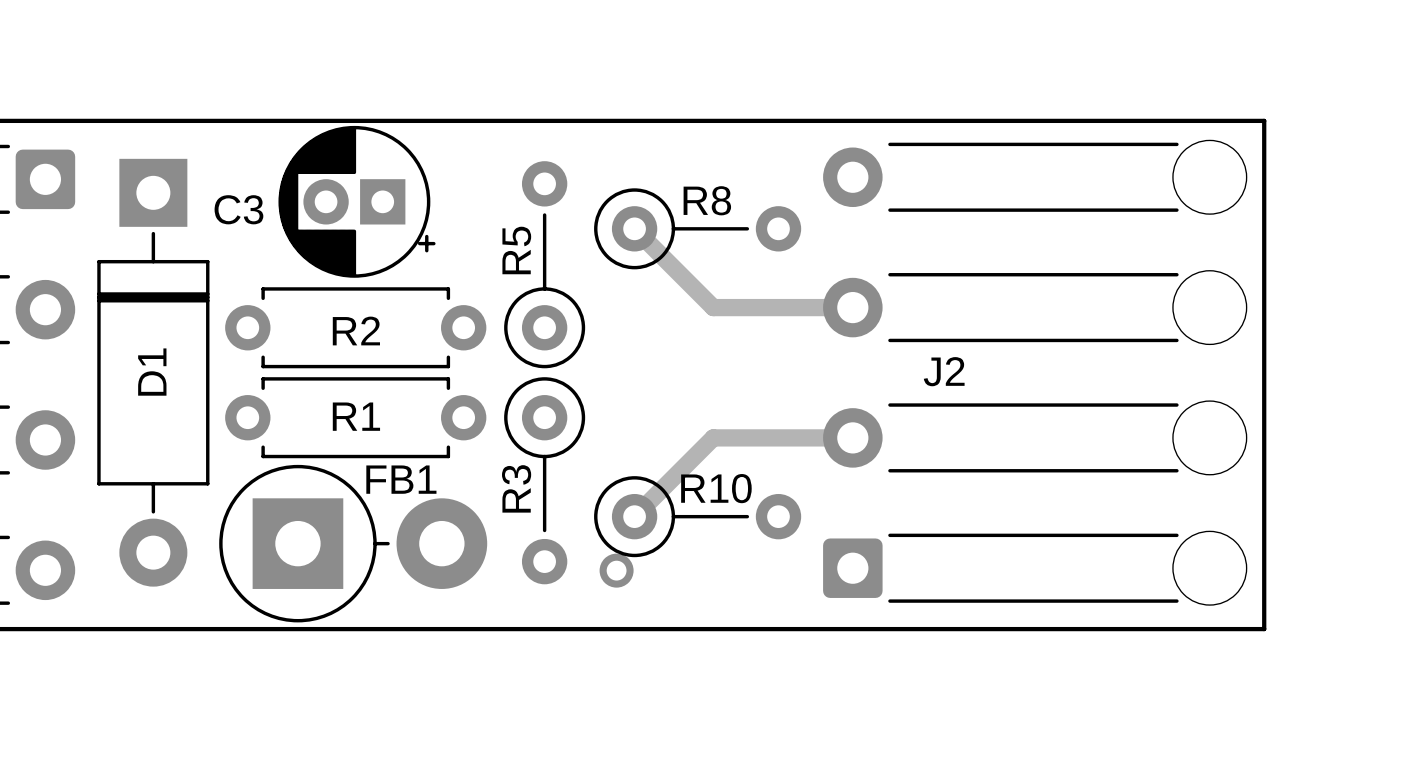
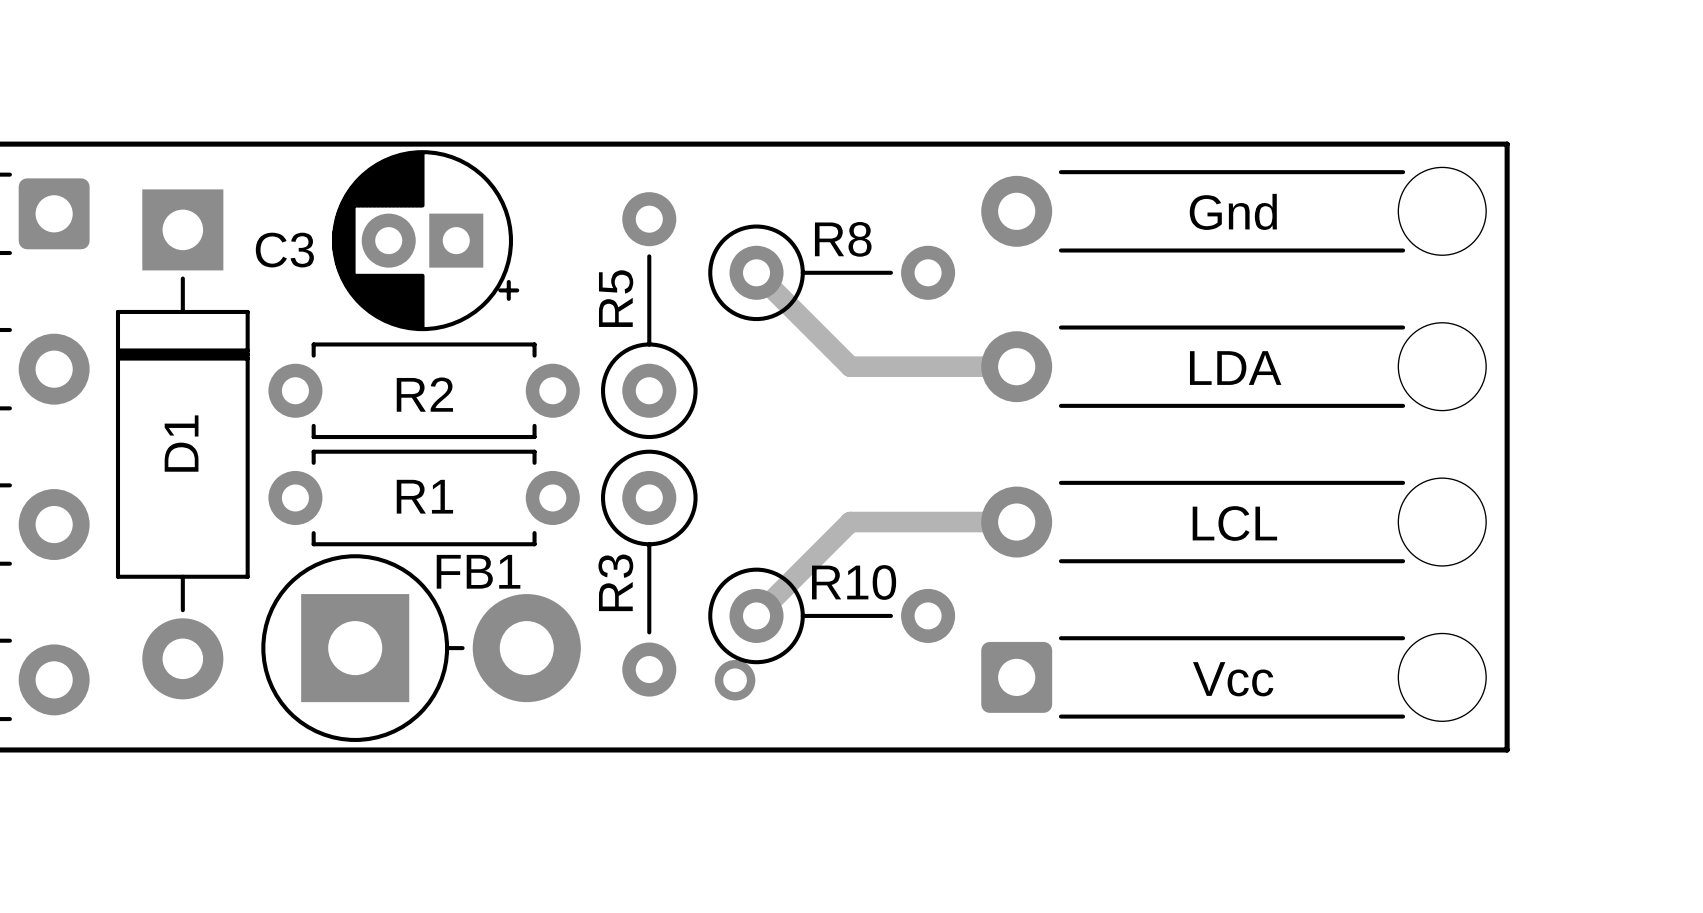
text: none -> Gnd (1233, 211)
text: none -> LDA (1235, 368)
J2 name: J2 (944, 371) -> none
text: none -> LCL (1234, 523)
text: none -> Vcc (1233, 679)

